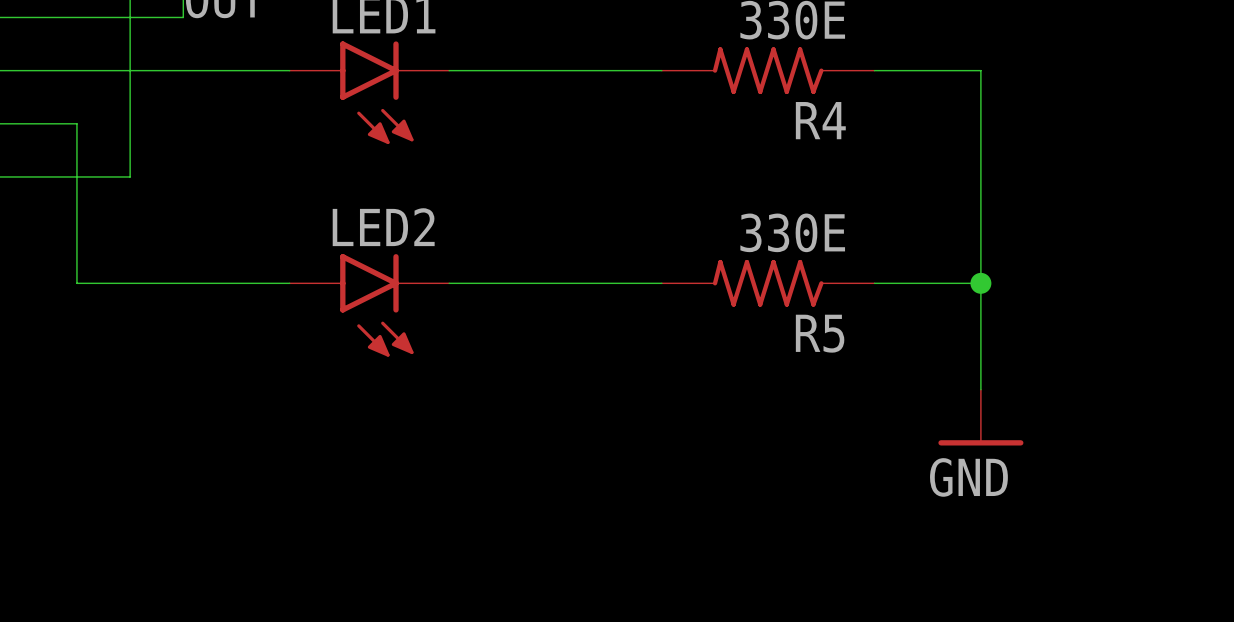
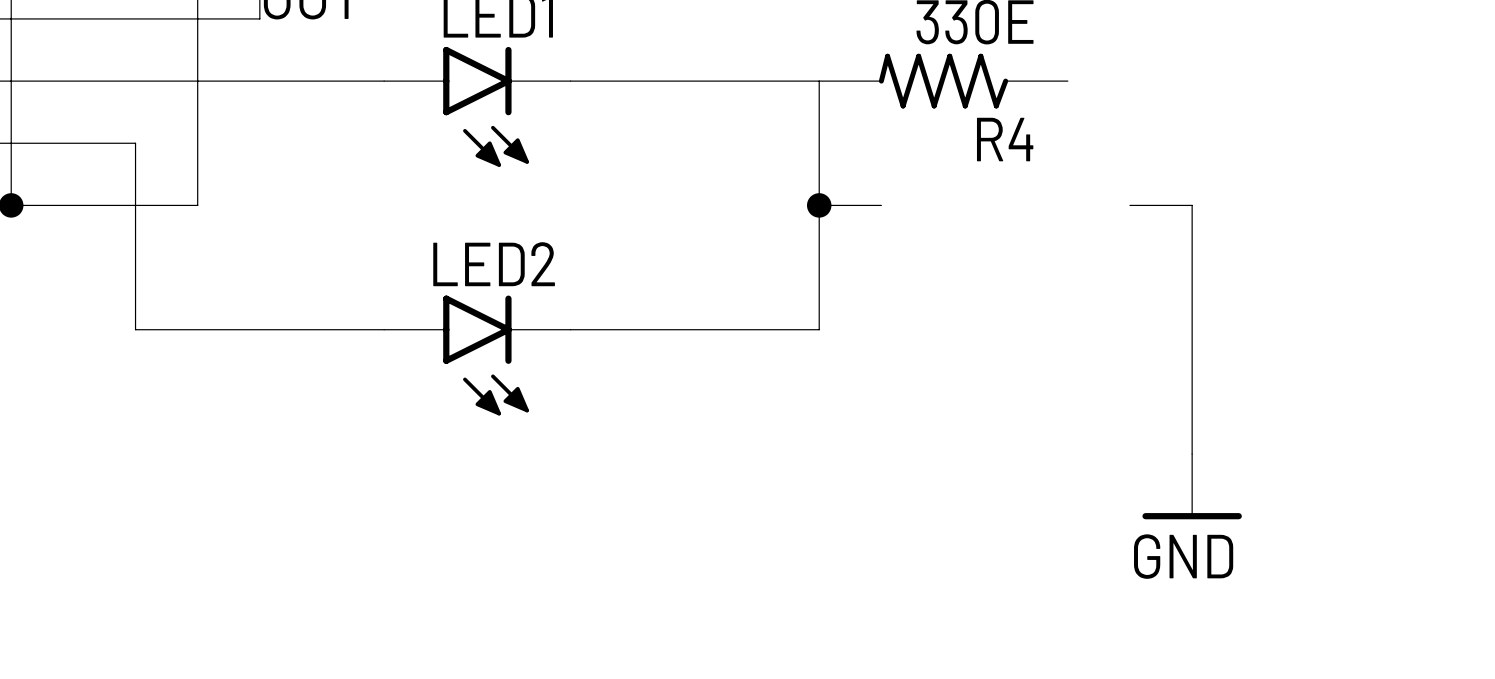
wire: none -> (819, 81) (819, 329)
wire: (874, 70) (980, 70) (980, 176) -> (1129, 205) (1192, 205)
wire: none -> (819, 205) (881, 205)
junction: none -> (819, 205)
R5: 330E (768, 283) -> none
wire: (874, 283) (980, 283) -> none
junction: (980, 283) -> none

